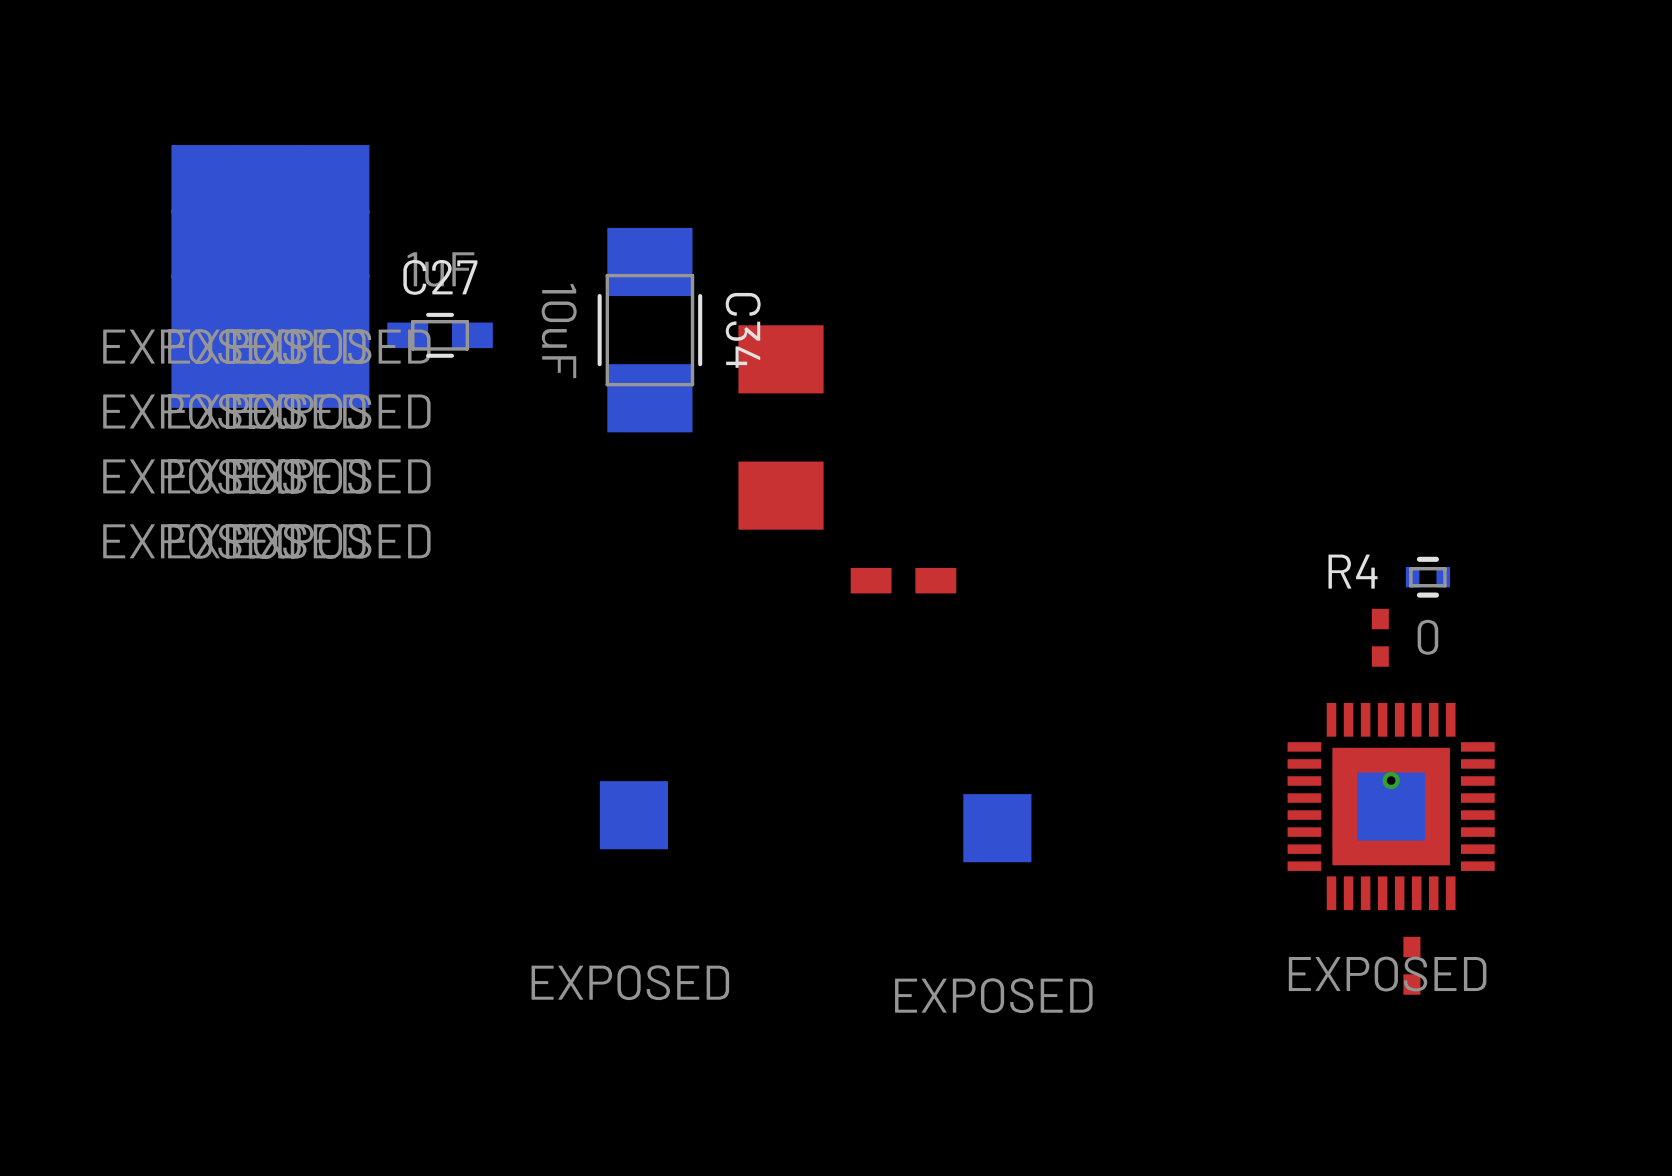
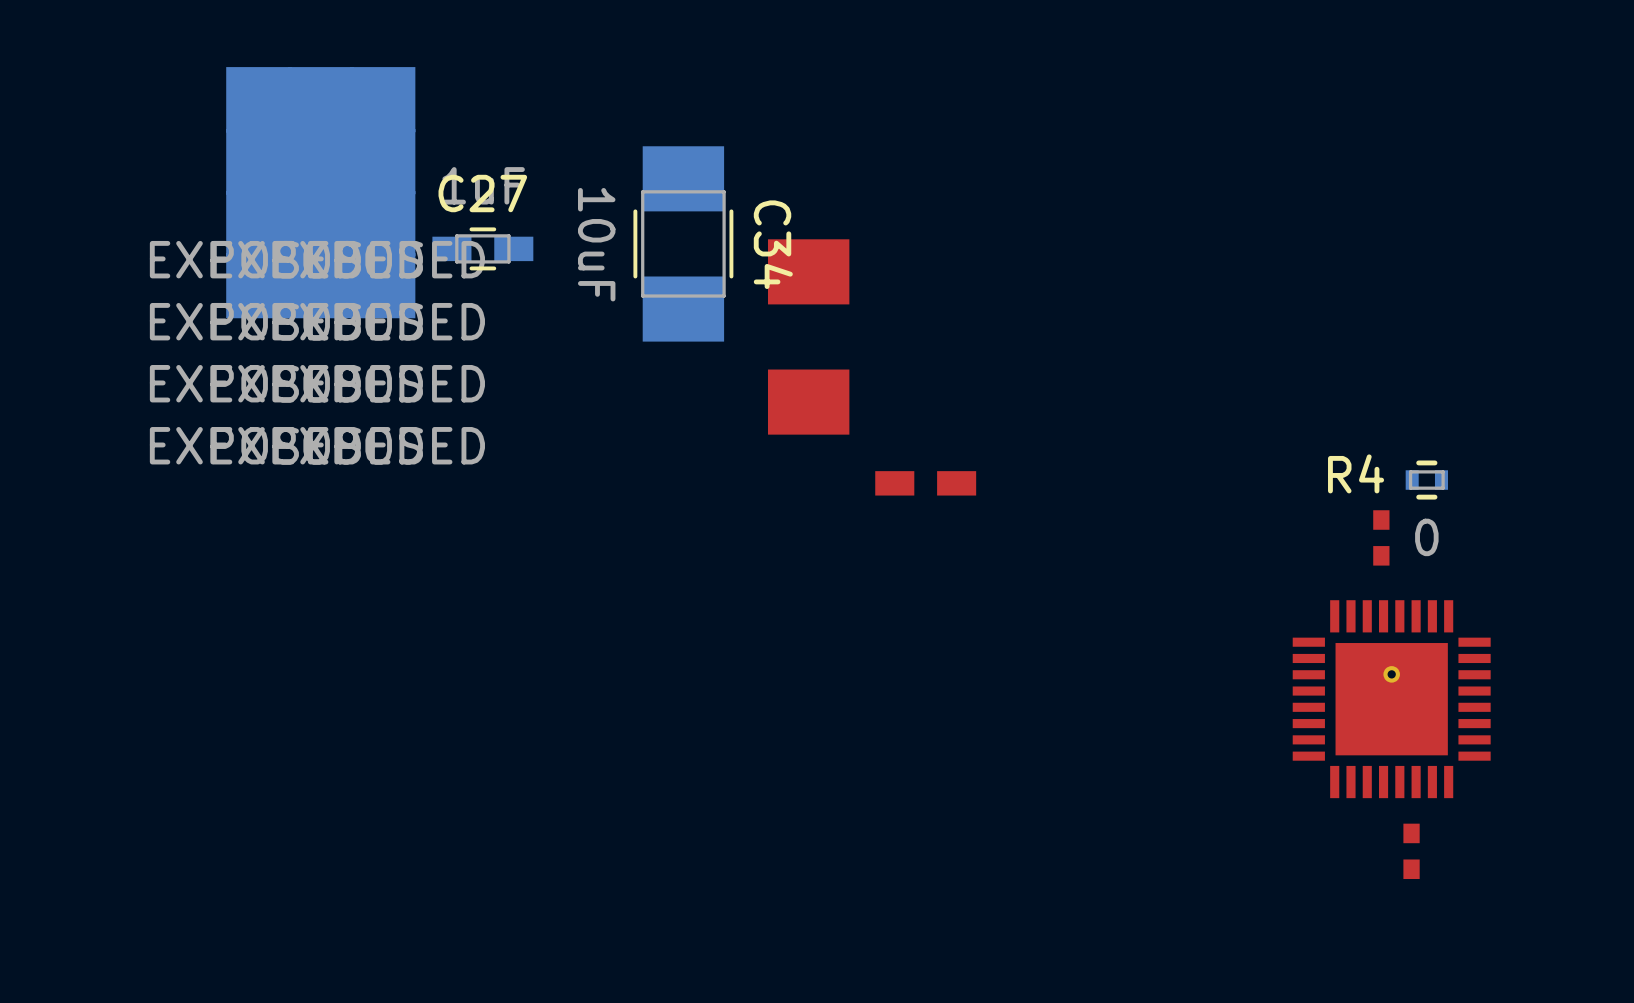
part: EXPOSED (1391, 806) -> none
part: EXPOSED (633, 815) -> none
part: EXPOSED (997, 828) -> none

